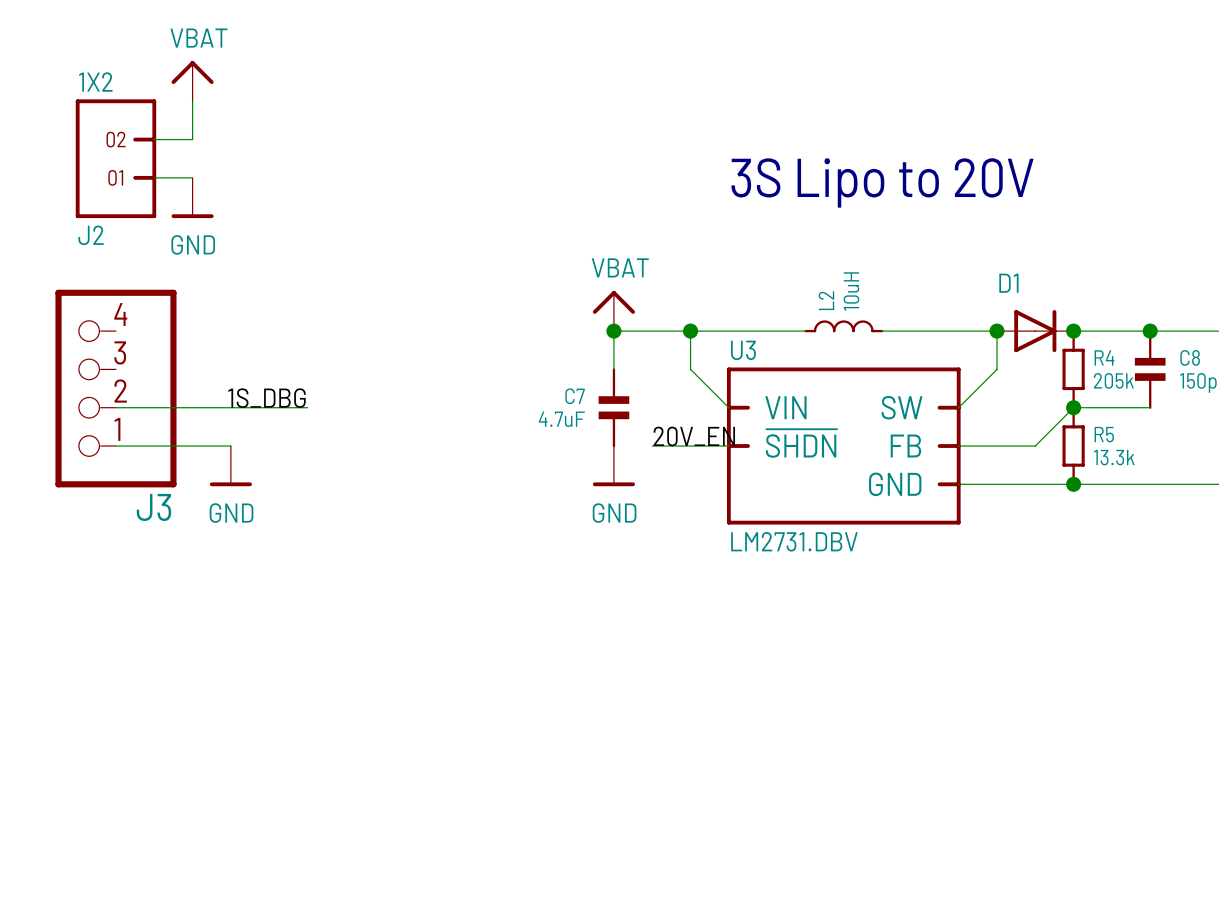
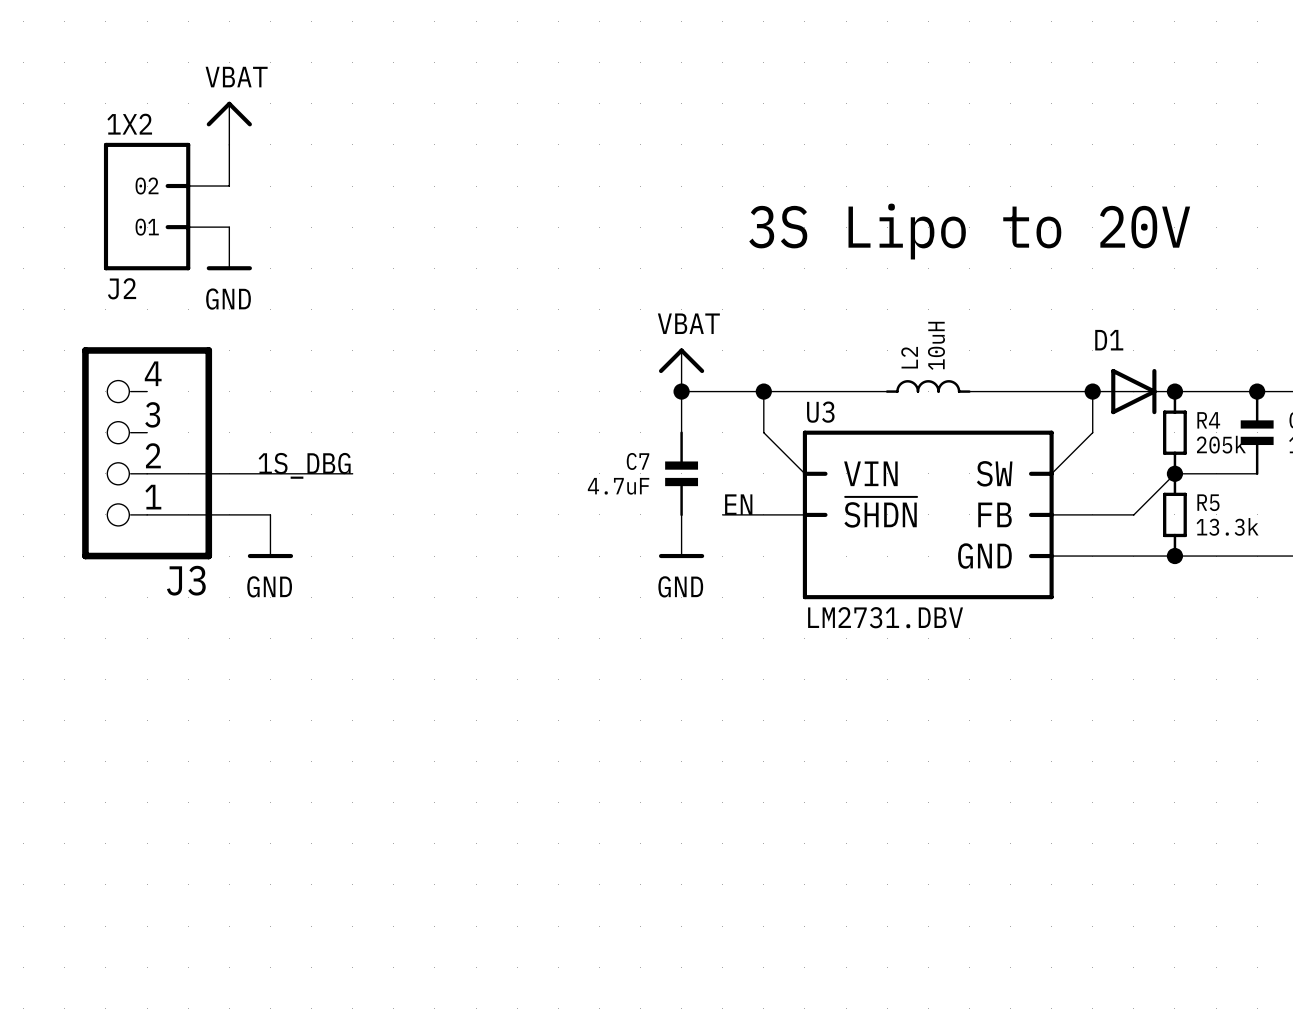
label: 20V_EN (694, 436) -> EN (738, 504)

